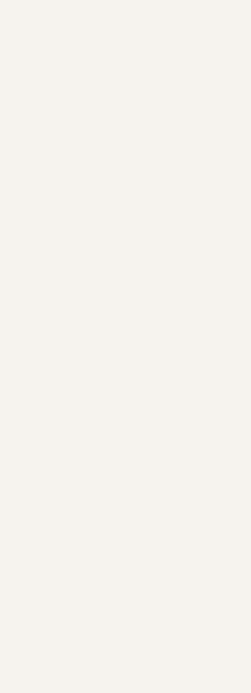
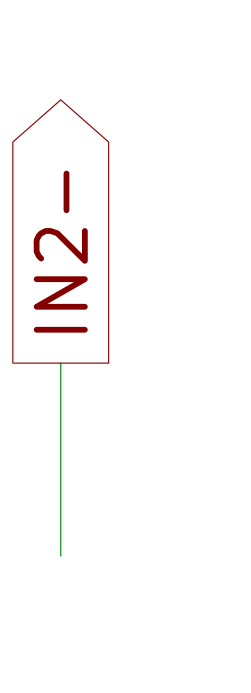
global label: none -> IN2- (60, 251)
wire: none -> (60, 363) (60, 556)

